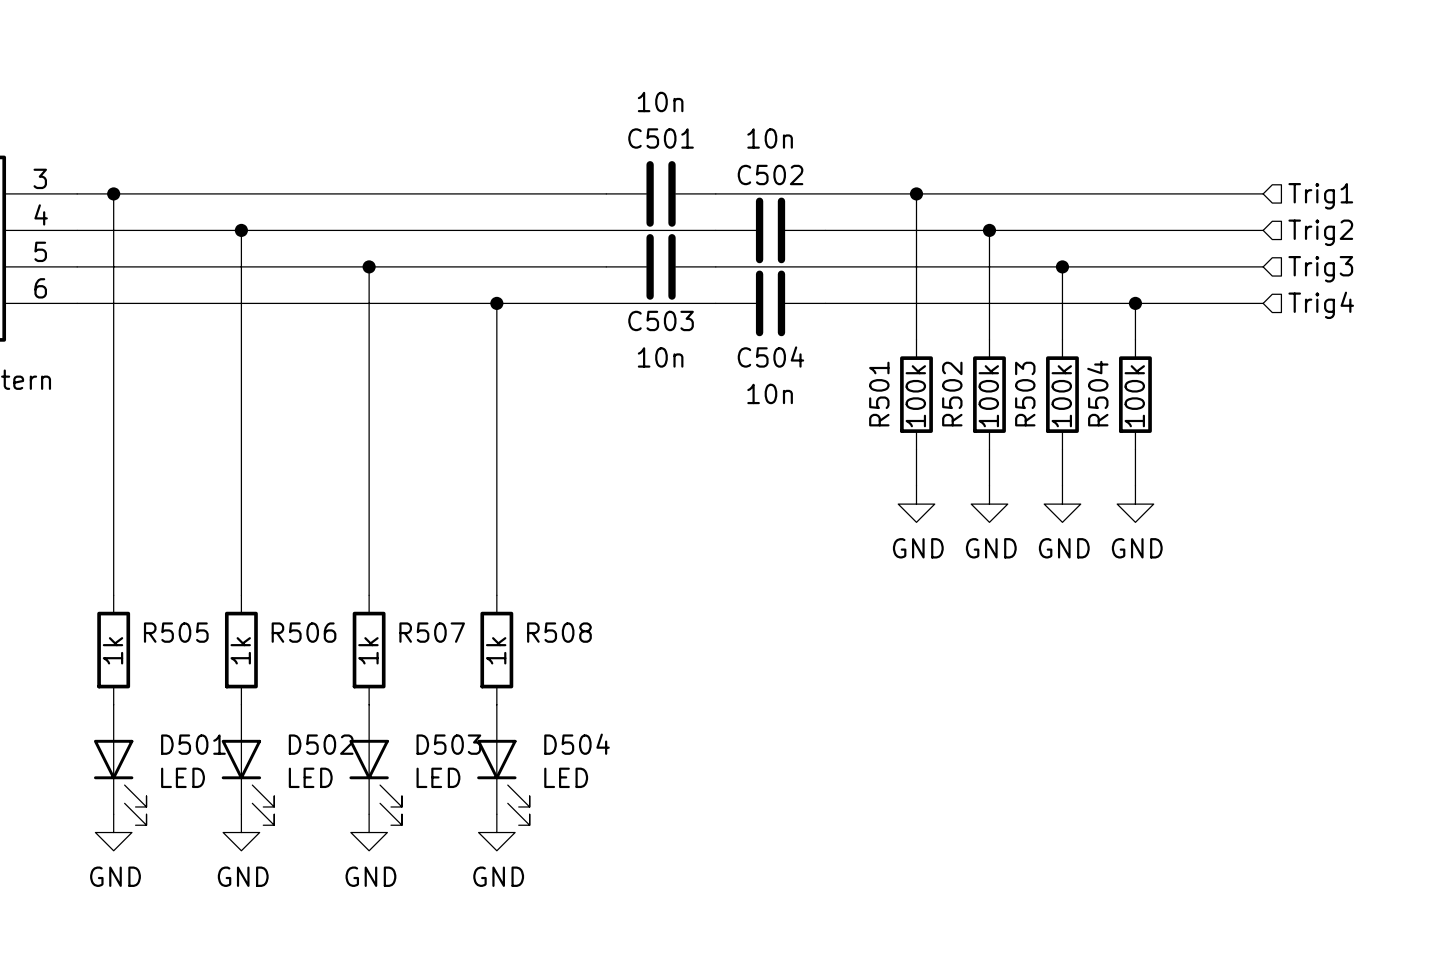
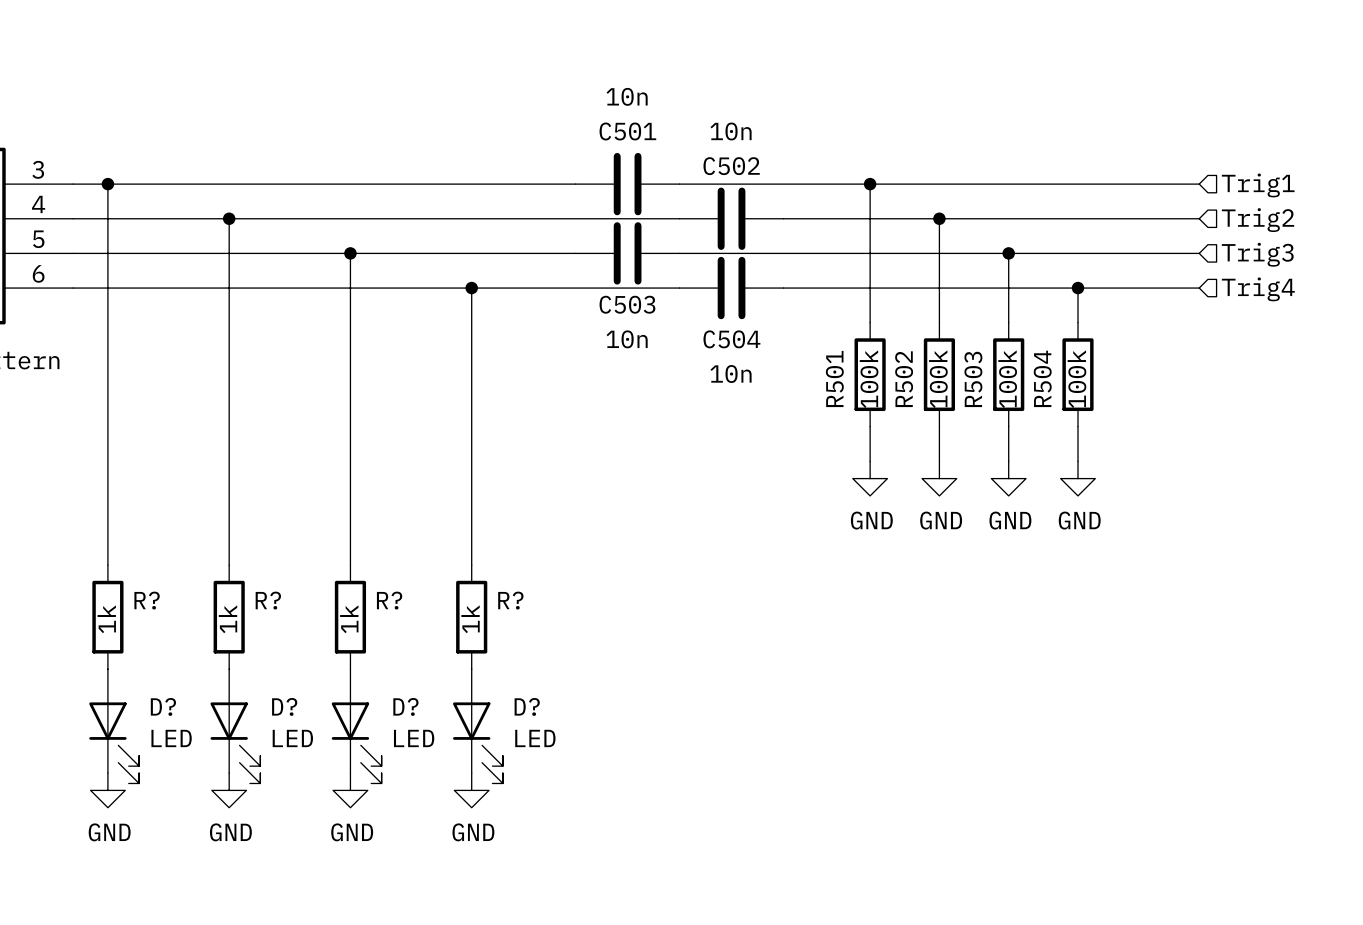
R505 name: R505 (176, 632) -> R? (147, 600)
R506 name: R506 (304, 632) -> R? (268, 600)
R507 name: R507 (432, 632) -> R? (389, 600)
R508 name: R508 (559, 632) -> R? (510, 600)
D501 name: D501 (193, 744) -> D? (163, 706)
D502 name: D502 (321, 744) -> D? (284, 706)
D503 name: D503 (448, 744) -> D? (405, 706)
D504 name: D504 (577, 744) -> D? (527, 706)

